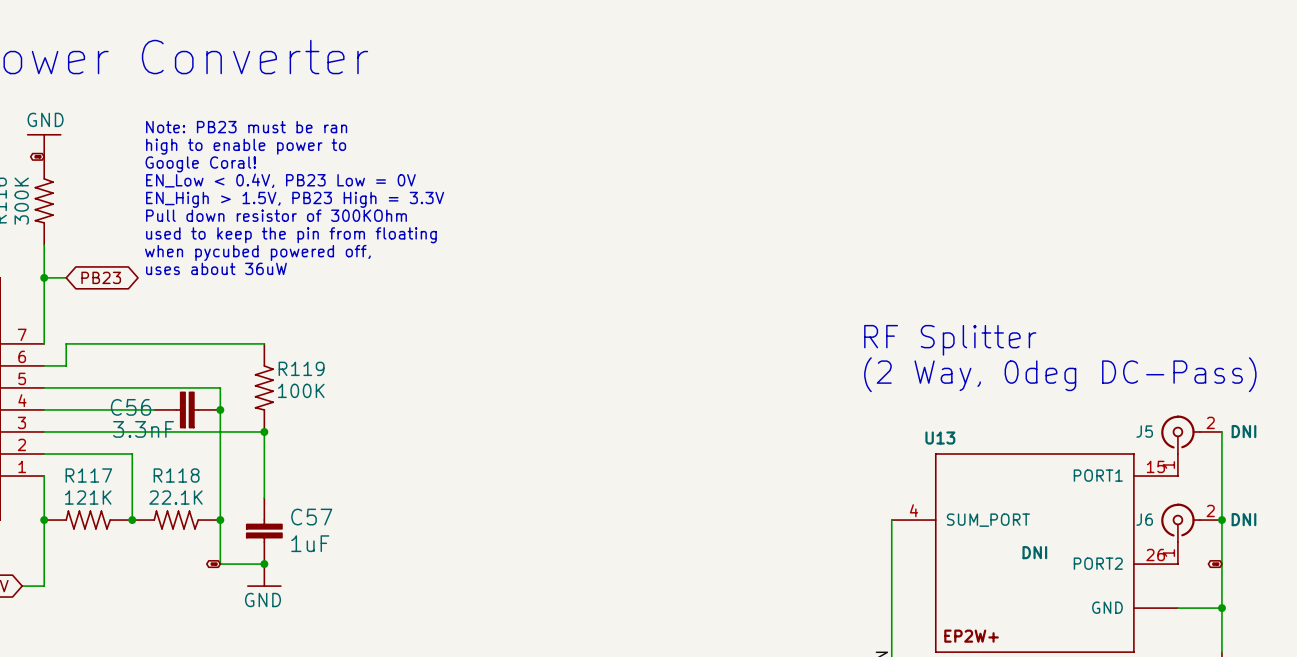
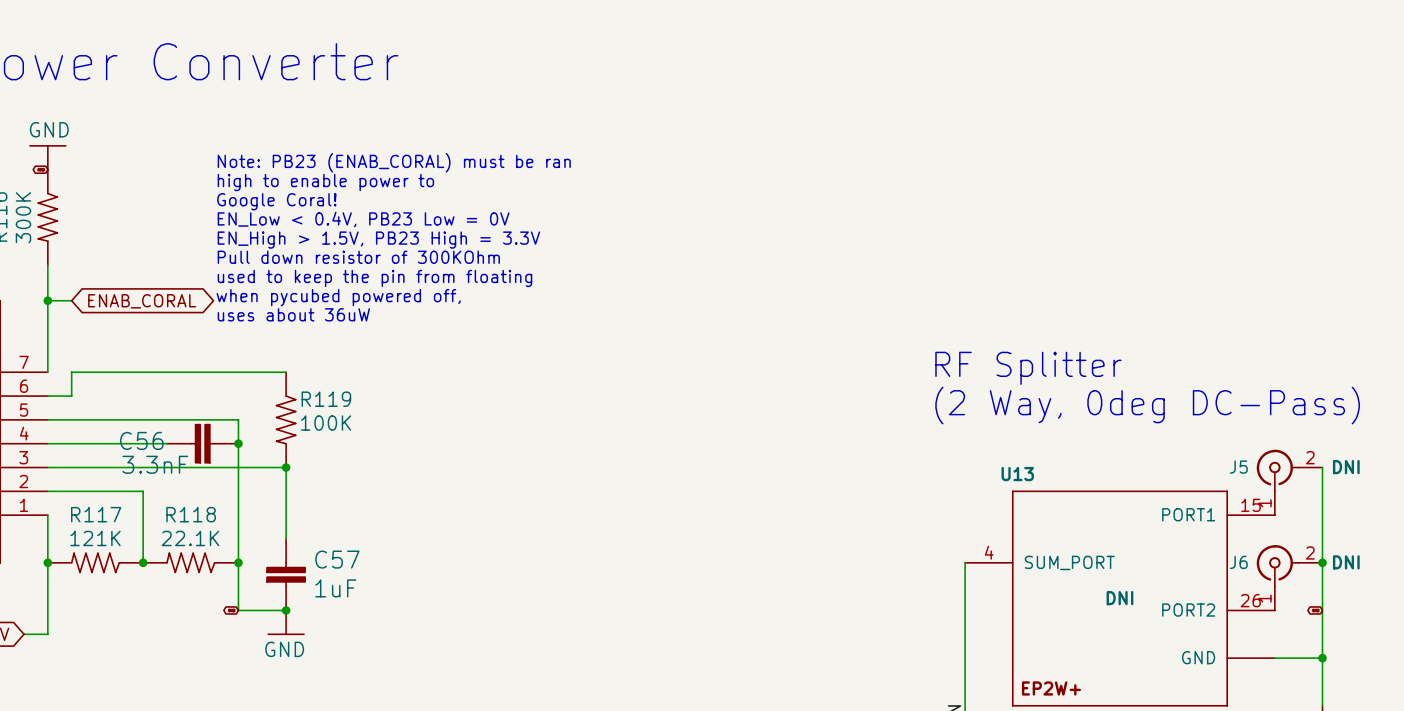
text: Note: PB23 must be ran (246, 127) -> Note: PB23 (ENAB_CORAL) must be ran (394, 162)
text position: high to enable power to (246, 146) -> high to enable power to (325, 182)
text position: Google Coral! (200, 164) -> Google Coral! (276, 201)
text position: EN_Low < 0.4V, PB23 Low = 0V (280, 180) -> EN_Low < 0.4V, PB23 Low = 0V (363, 219)
text position: EN_High > 1.5V, PB23 High = 3.3V (295, 199) -> EN_High > 1.5V, PB23 High = 3.3V (378, 240)
text position: Pull down resistor of 300KOhm (276, 215) -> Pull down resistor of 300KOhm (358, 257)
text position: used to keep the pin from floating (291, 235) -> used to keep the pin from floating (374, 278)
text position: when pycubed powered off, (257, 252) -> when pycubed powered off, (338, 297)
text position: uses about 36uW (216, 268) -> uses about 36uW (293, 314)
global label: PB23 (101, 277) -> ENAB_CORAL (142, 301)

